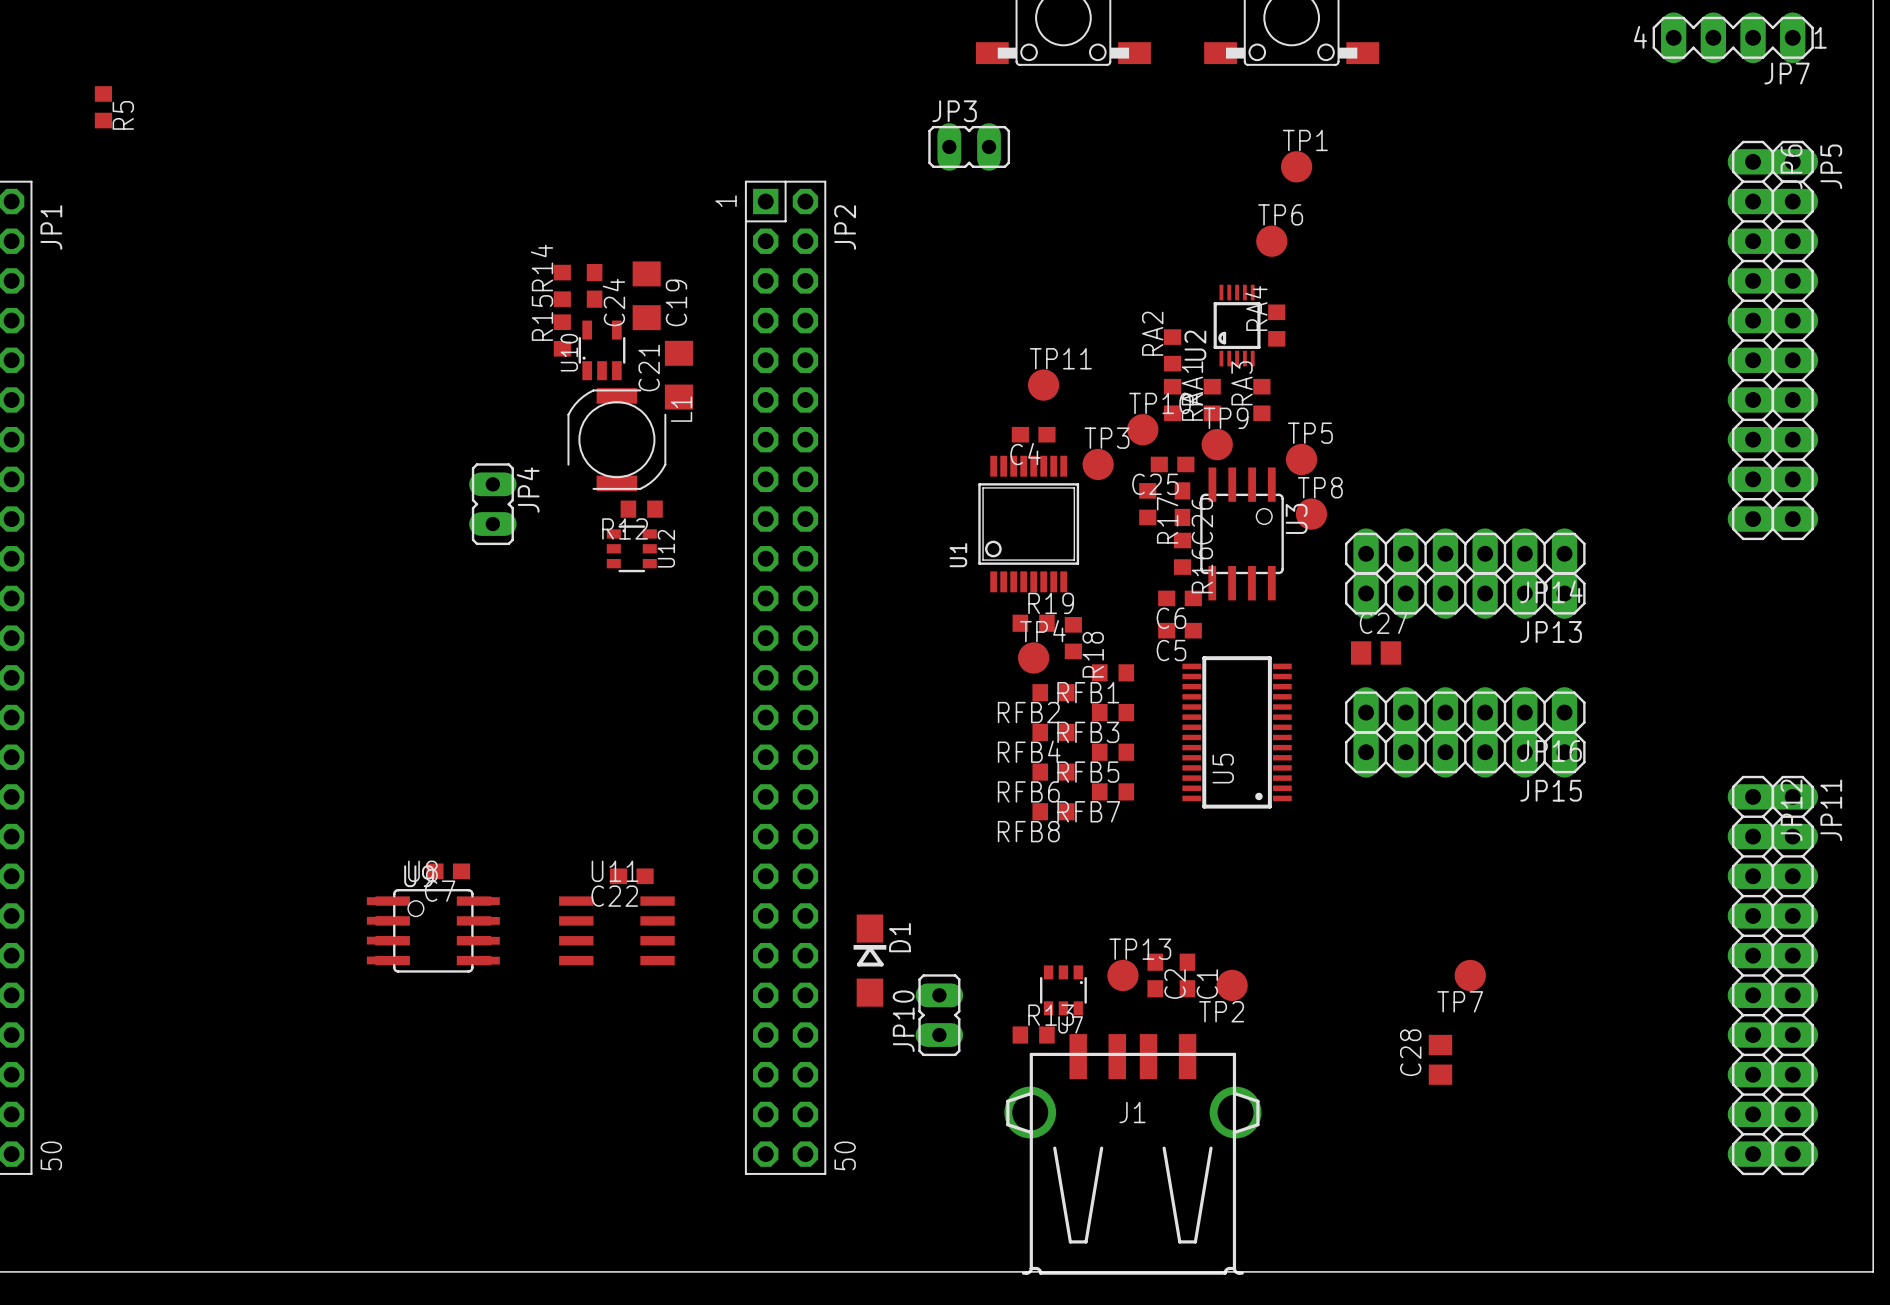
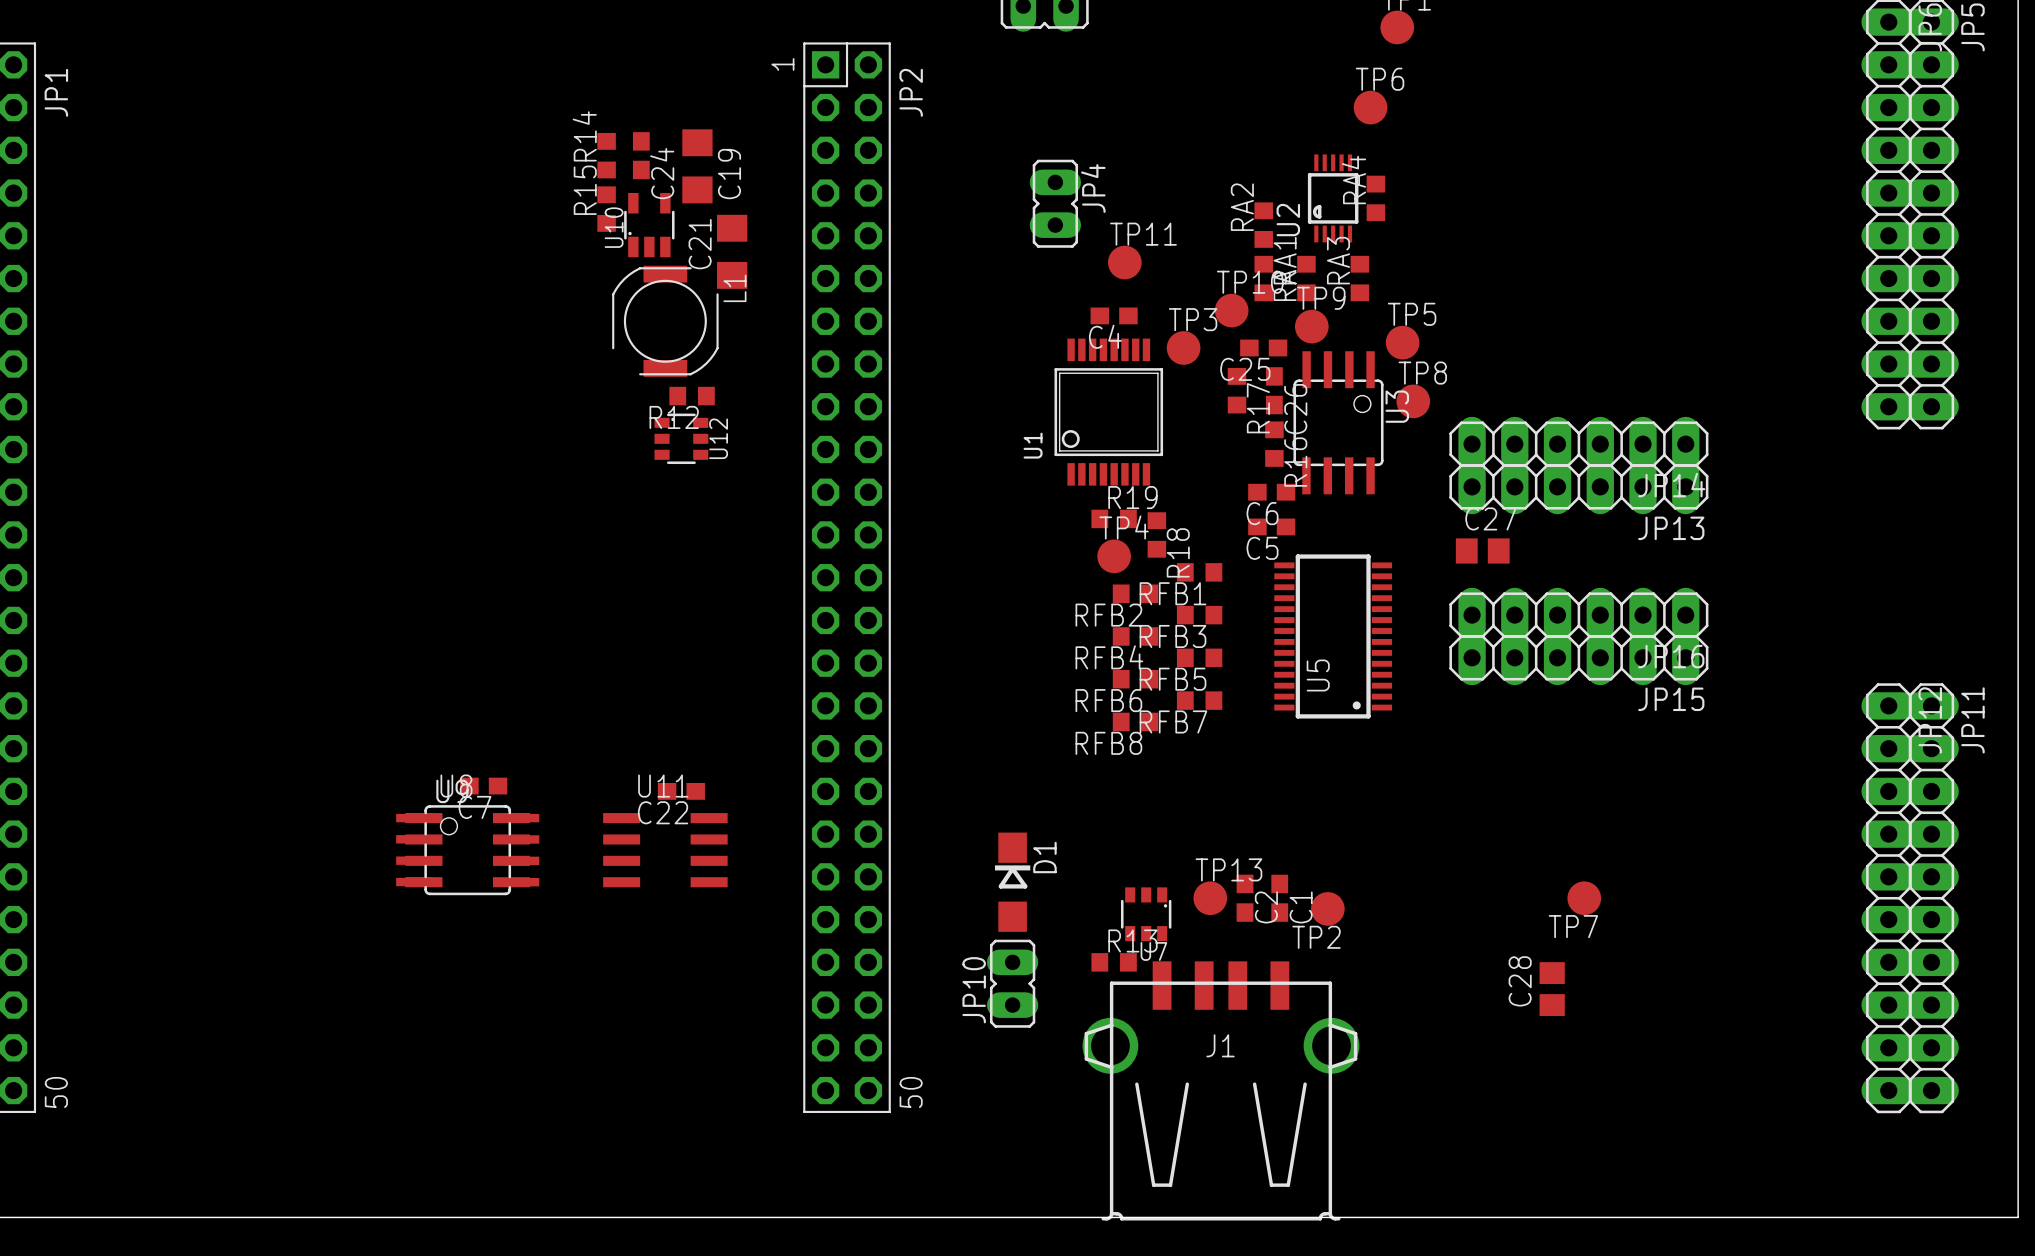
JP4 position: (492, 504) -> (1055, 203)
D1 position: (869, 960) -> (1012, 882)
JP10 position: (939, 1015) -> (1012, 983)

